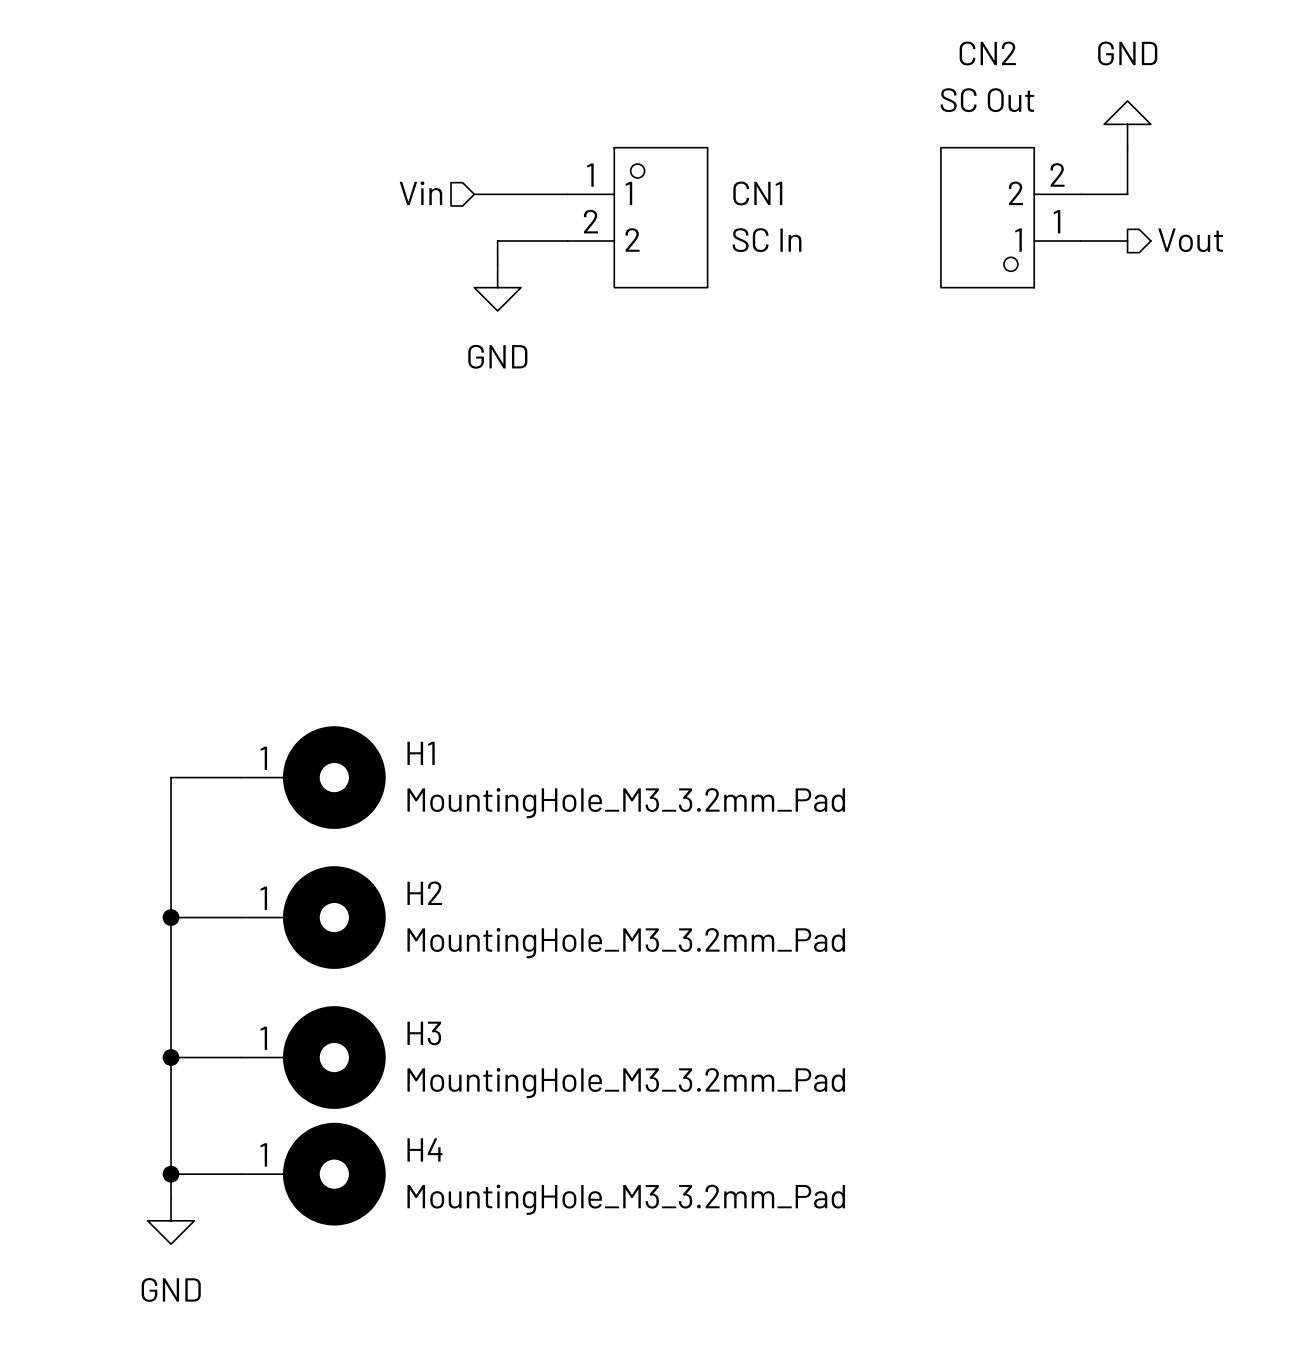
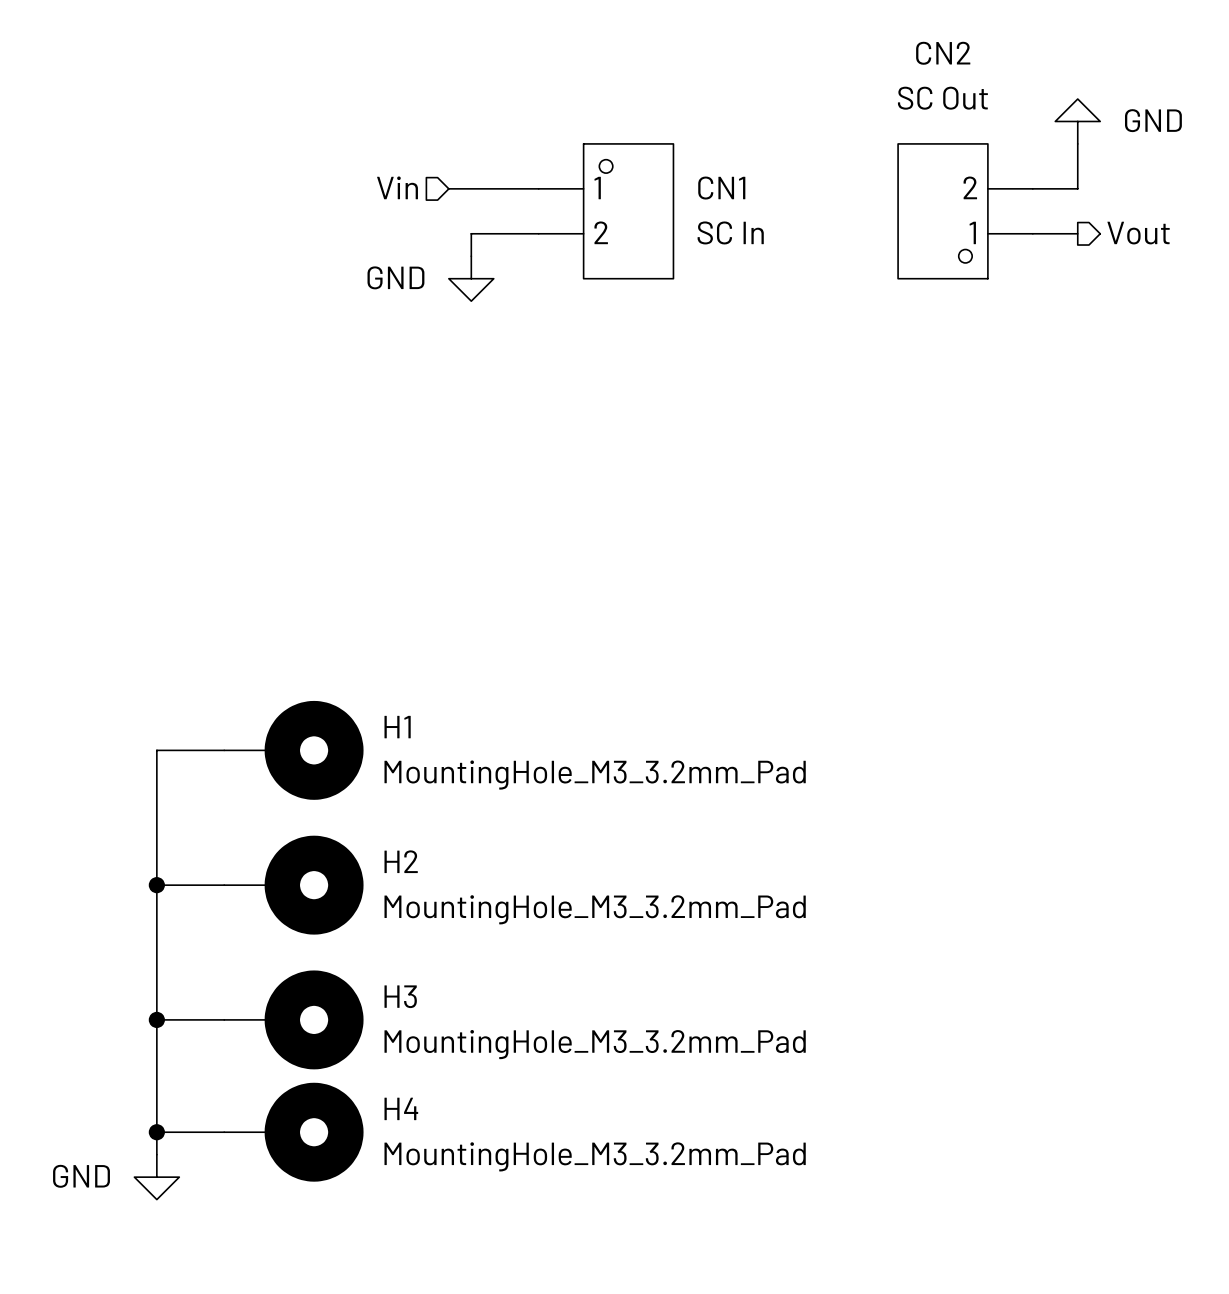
power symbol text position: GND (1127, 53) -> GND (1153, 120)
CN2 pin number: 2 (1057, 174) -> none
CN1 pin number: 1 (590, 175) -> none
CN1 pin number: 2 (590, 221) -> none
CN2 pin number: 1 (1056, 221) -> none
power symbol text position: GND (497, 356) -> GND (395, 277)
H1 pin number: 1 (263, 758) -> none
H2 pin number: 1 (263, 898) -> none
H3 pin number: 1 (263, 1038) -> none
H4 pin number: 1 (263, 1154) -> none
power symbol text position: GND (171, 1289) -> GND (81, 1176)

